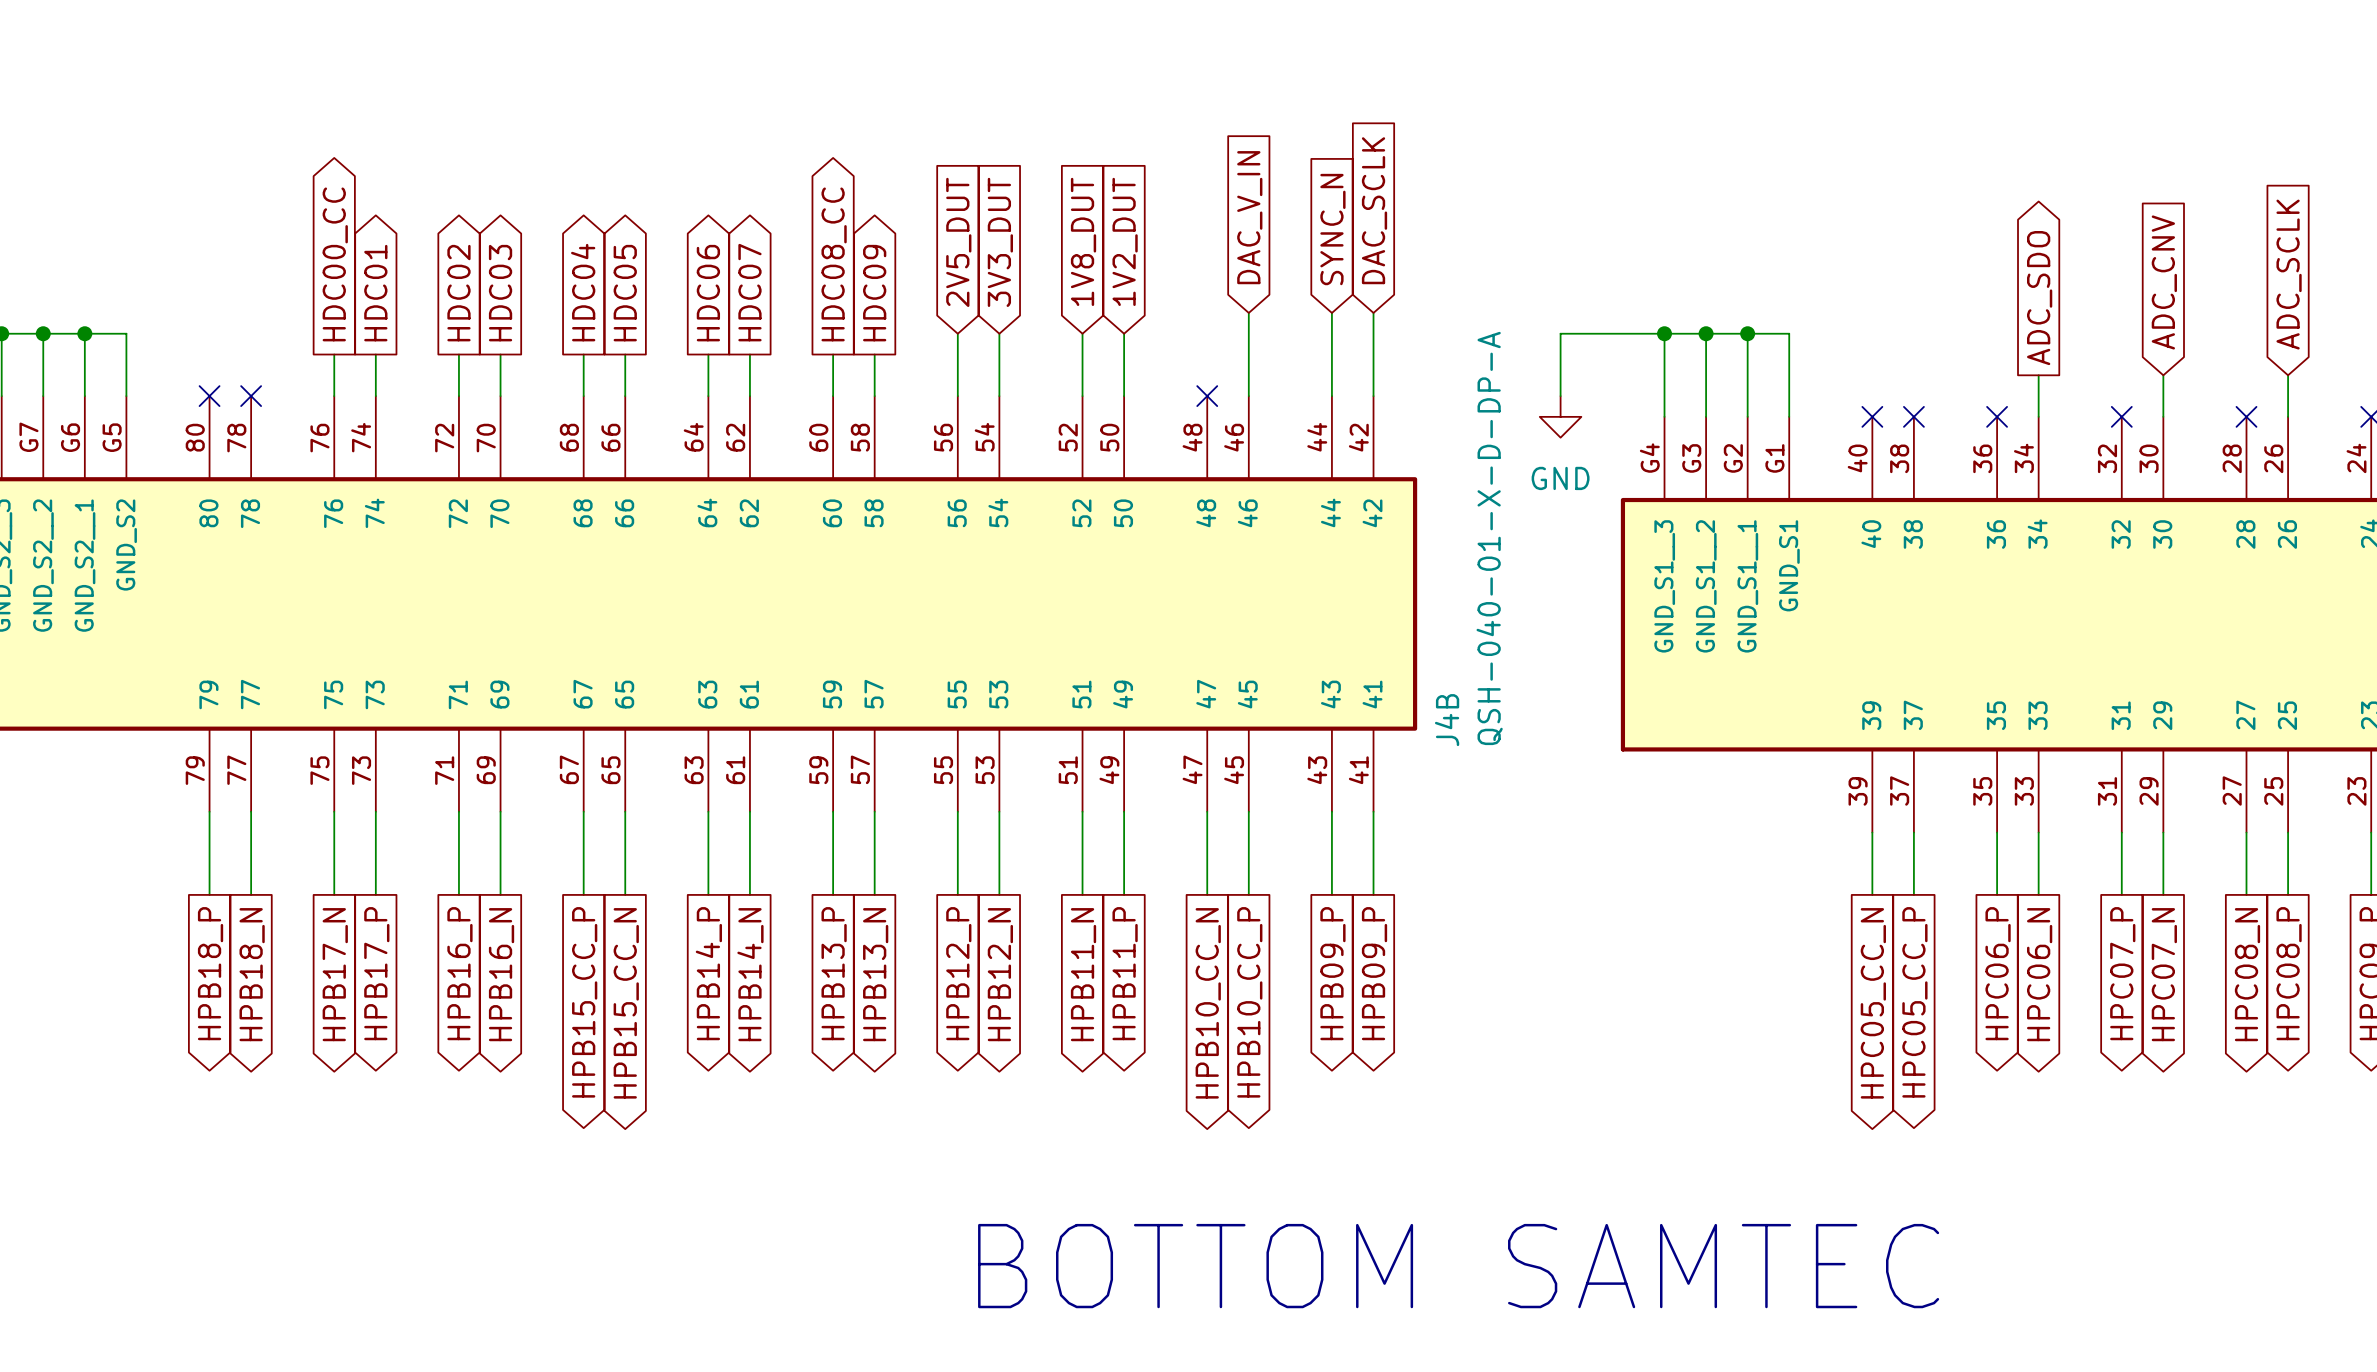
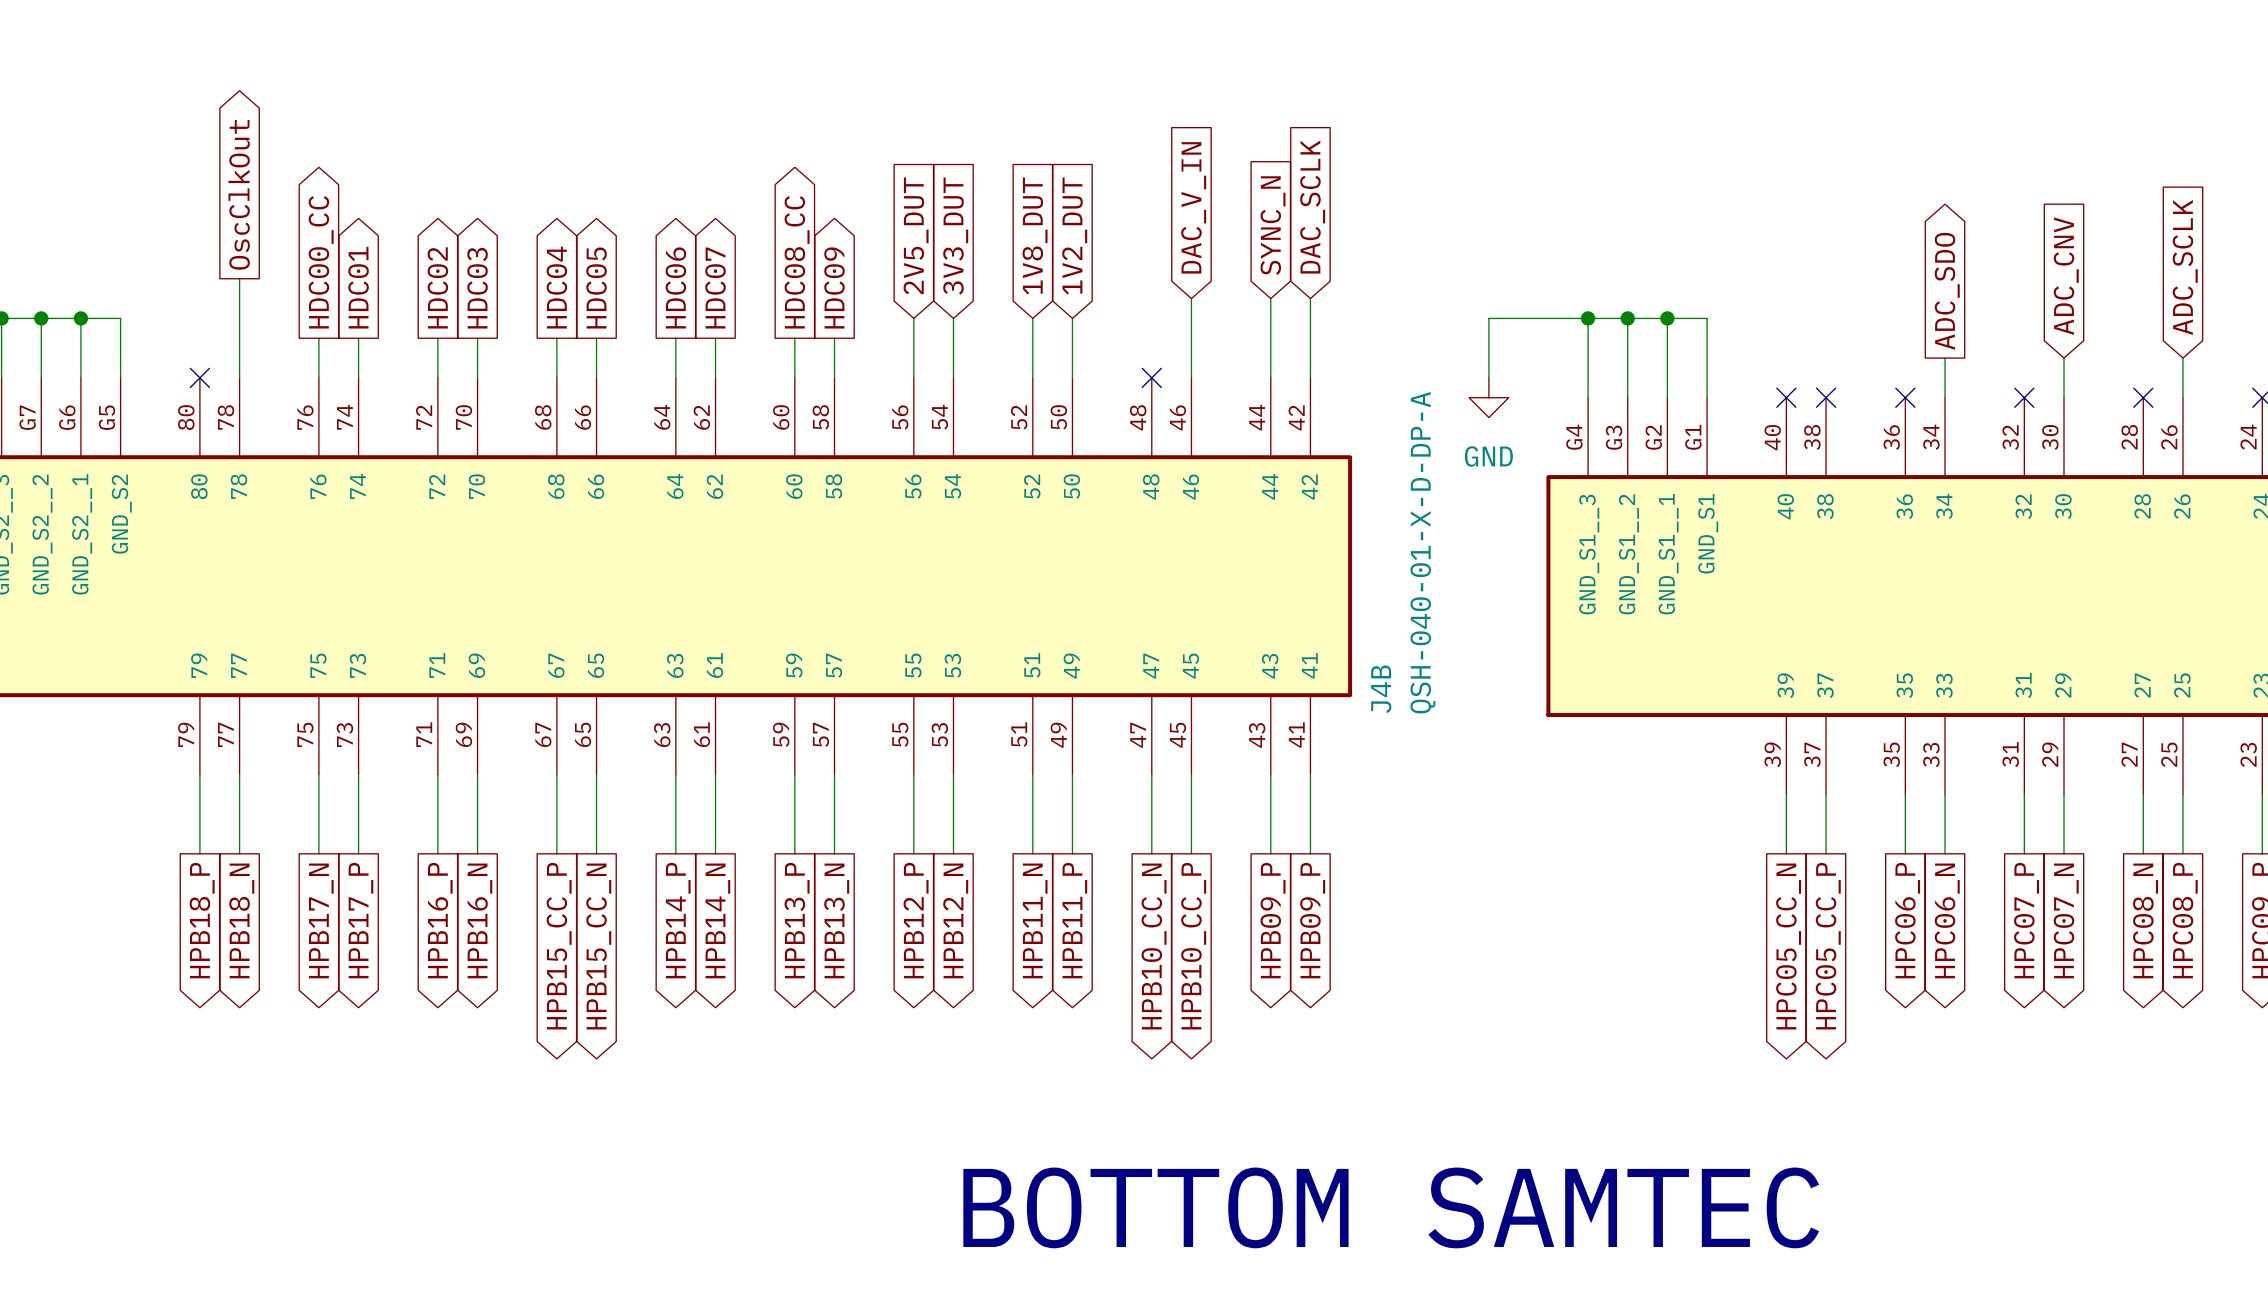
global label: none -> OscClkOut (239, 194)
wire: none -> (239, 278) (239, 377)
no-connect mark: (251, 396) -> none

